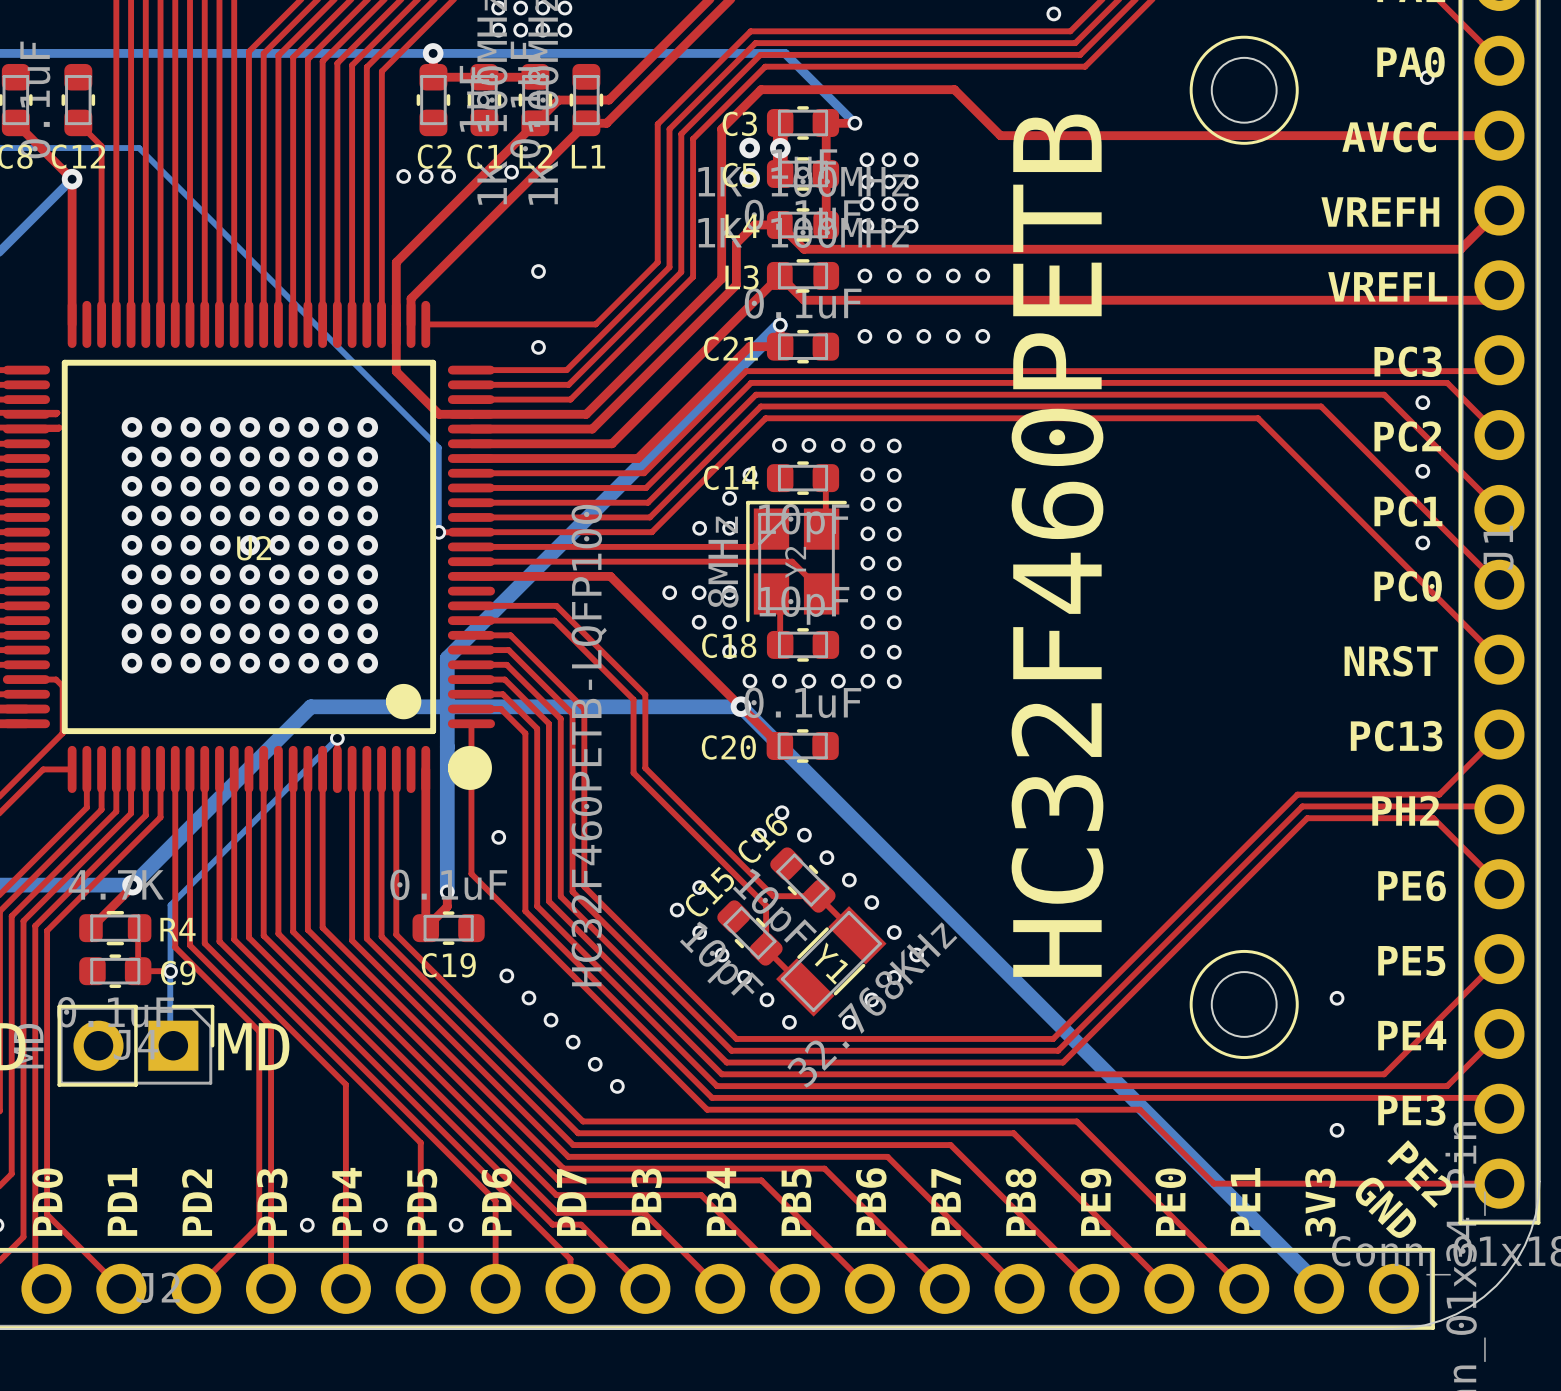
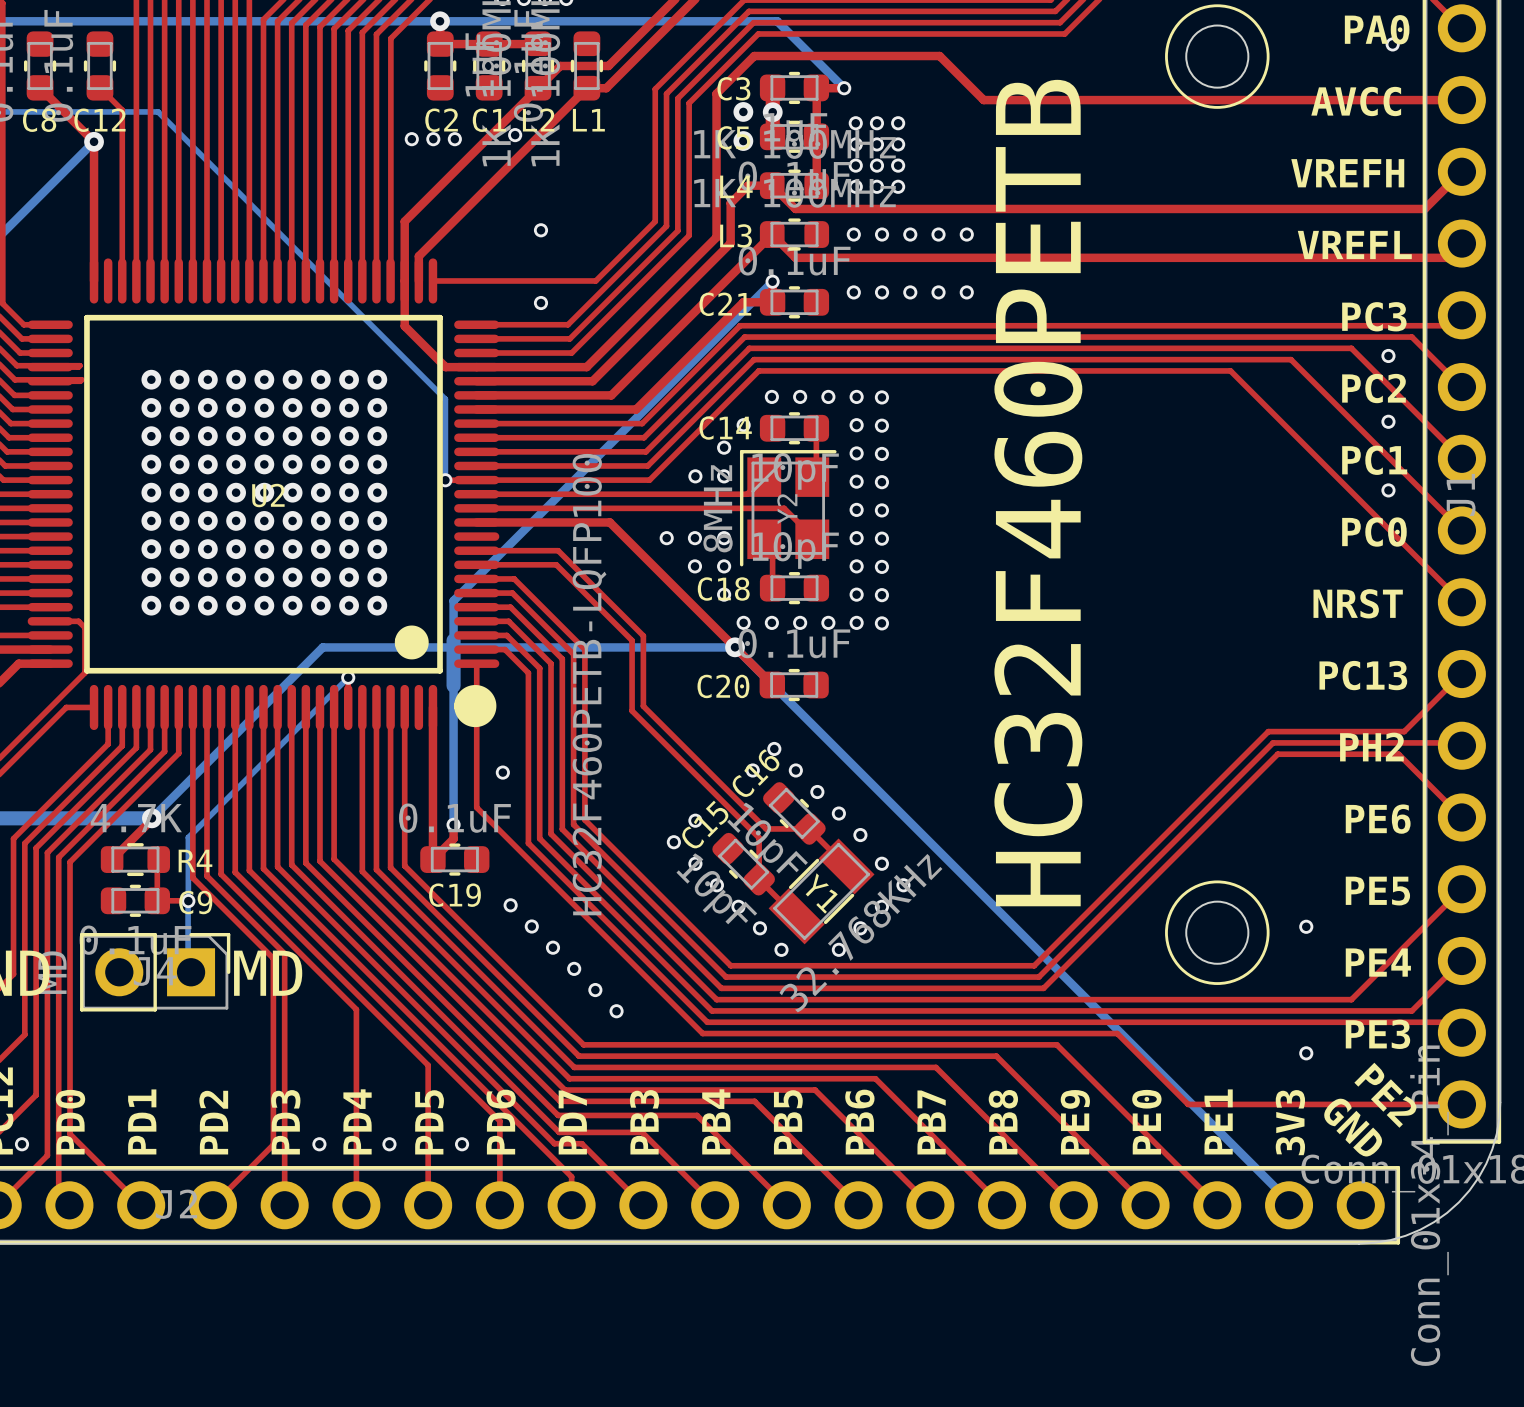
bottom track width: thick (780, 325) (447, 658) (447, 699) -> thin (772, 281) (453, 600) (453, 640)
bottom track width: thick (740, 706) (1319, 1284) -> thin (735, 647) (1289, 1201)
bottom track width: thick (740, 706) (310, 706) (132, 885) -> thin (734, 647) (322, 647) (151, 818)
bottom track width: thick (447, 746) (447, 891) -> thin (453, 685) (453, 824)

